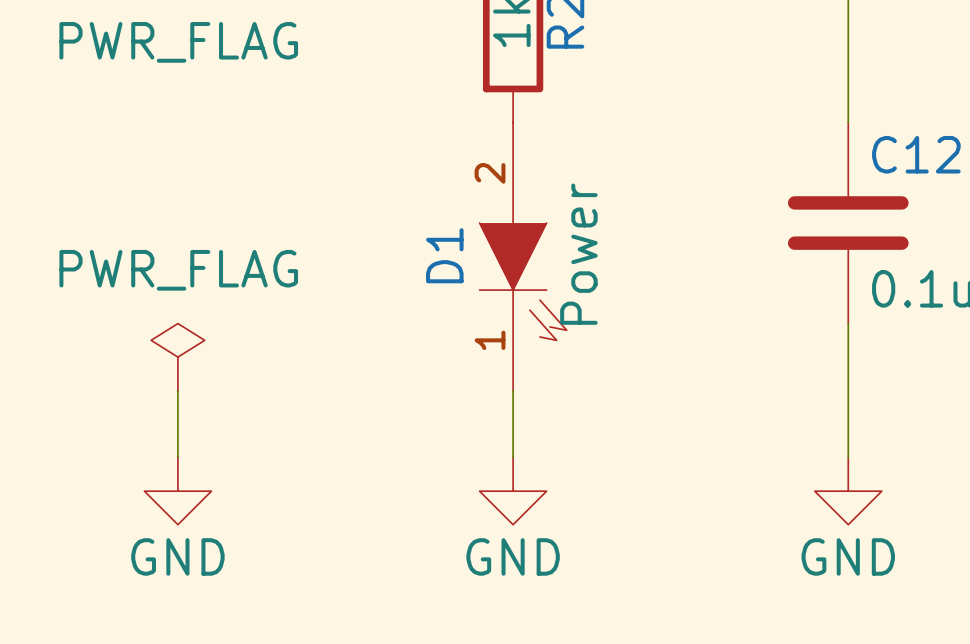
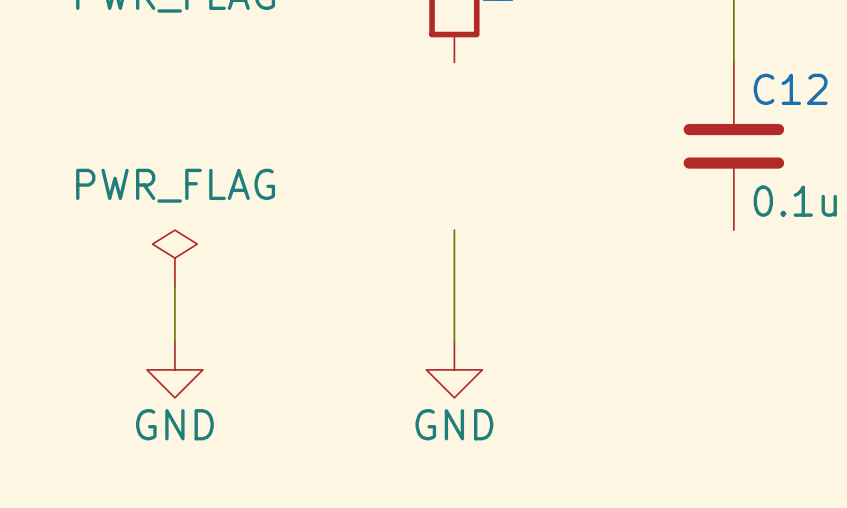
D1: Power (523, 256) -> none
wire: (848, 323) (848, 457) -> none
power symbol: GND (848, 491) -> none

